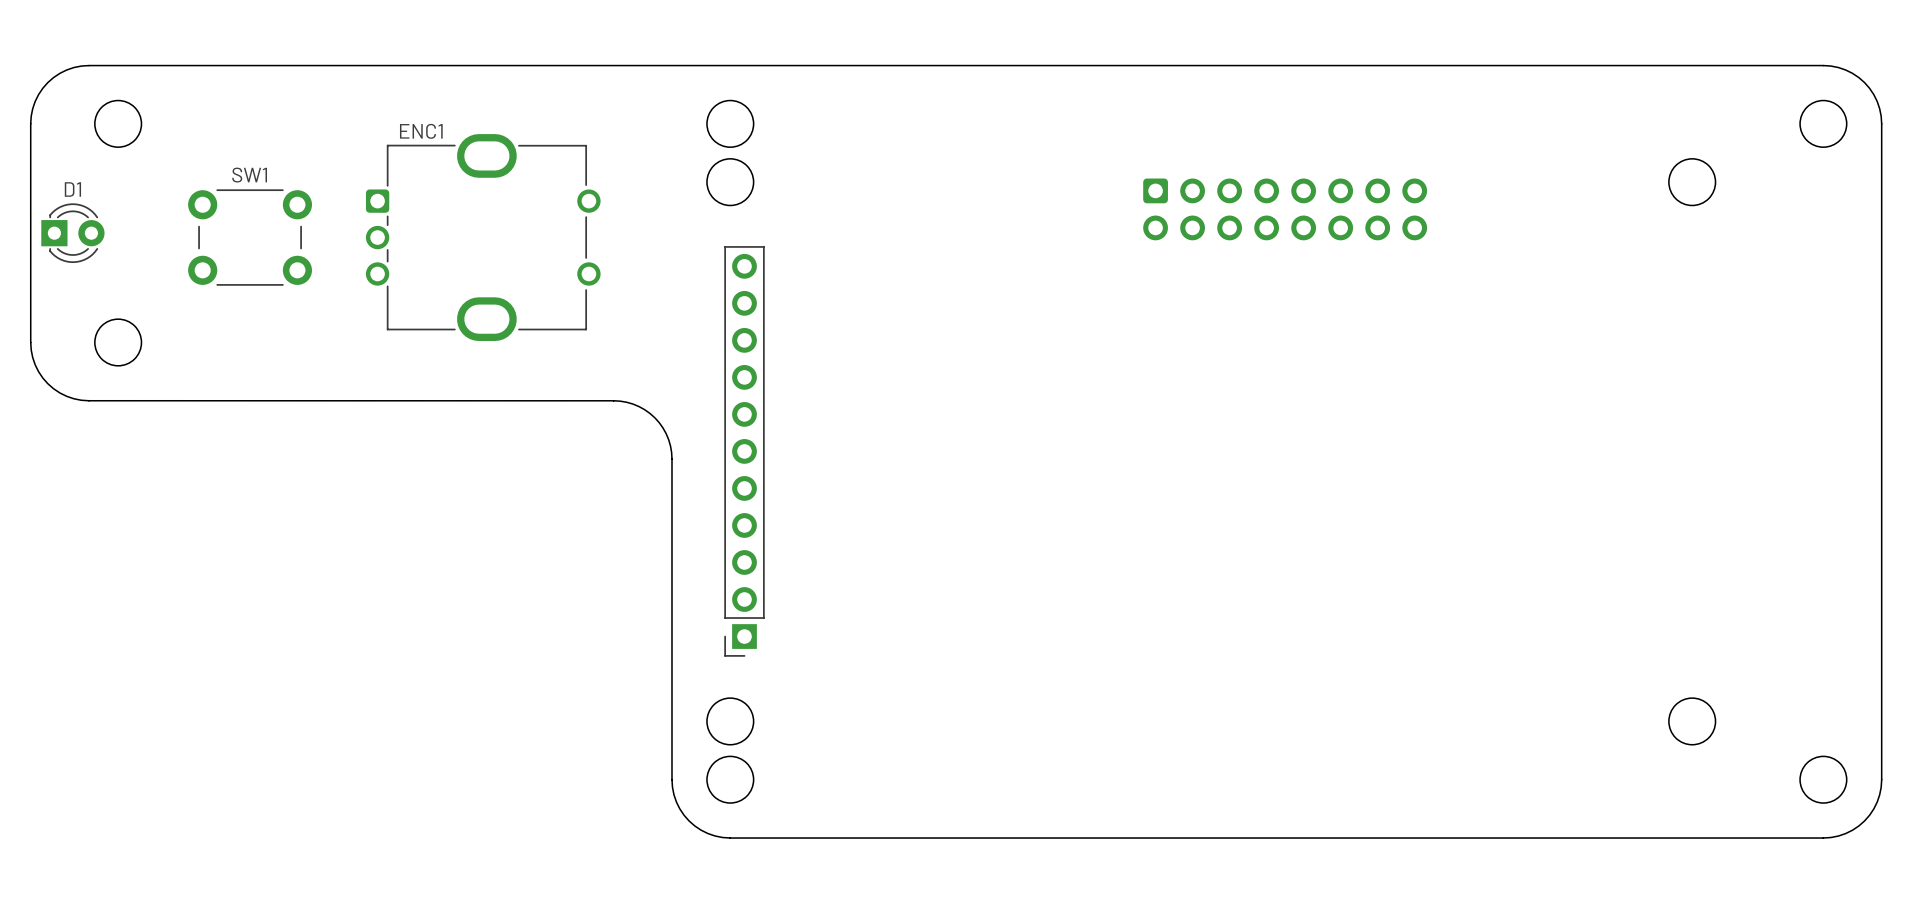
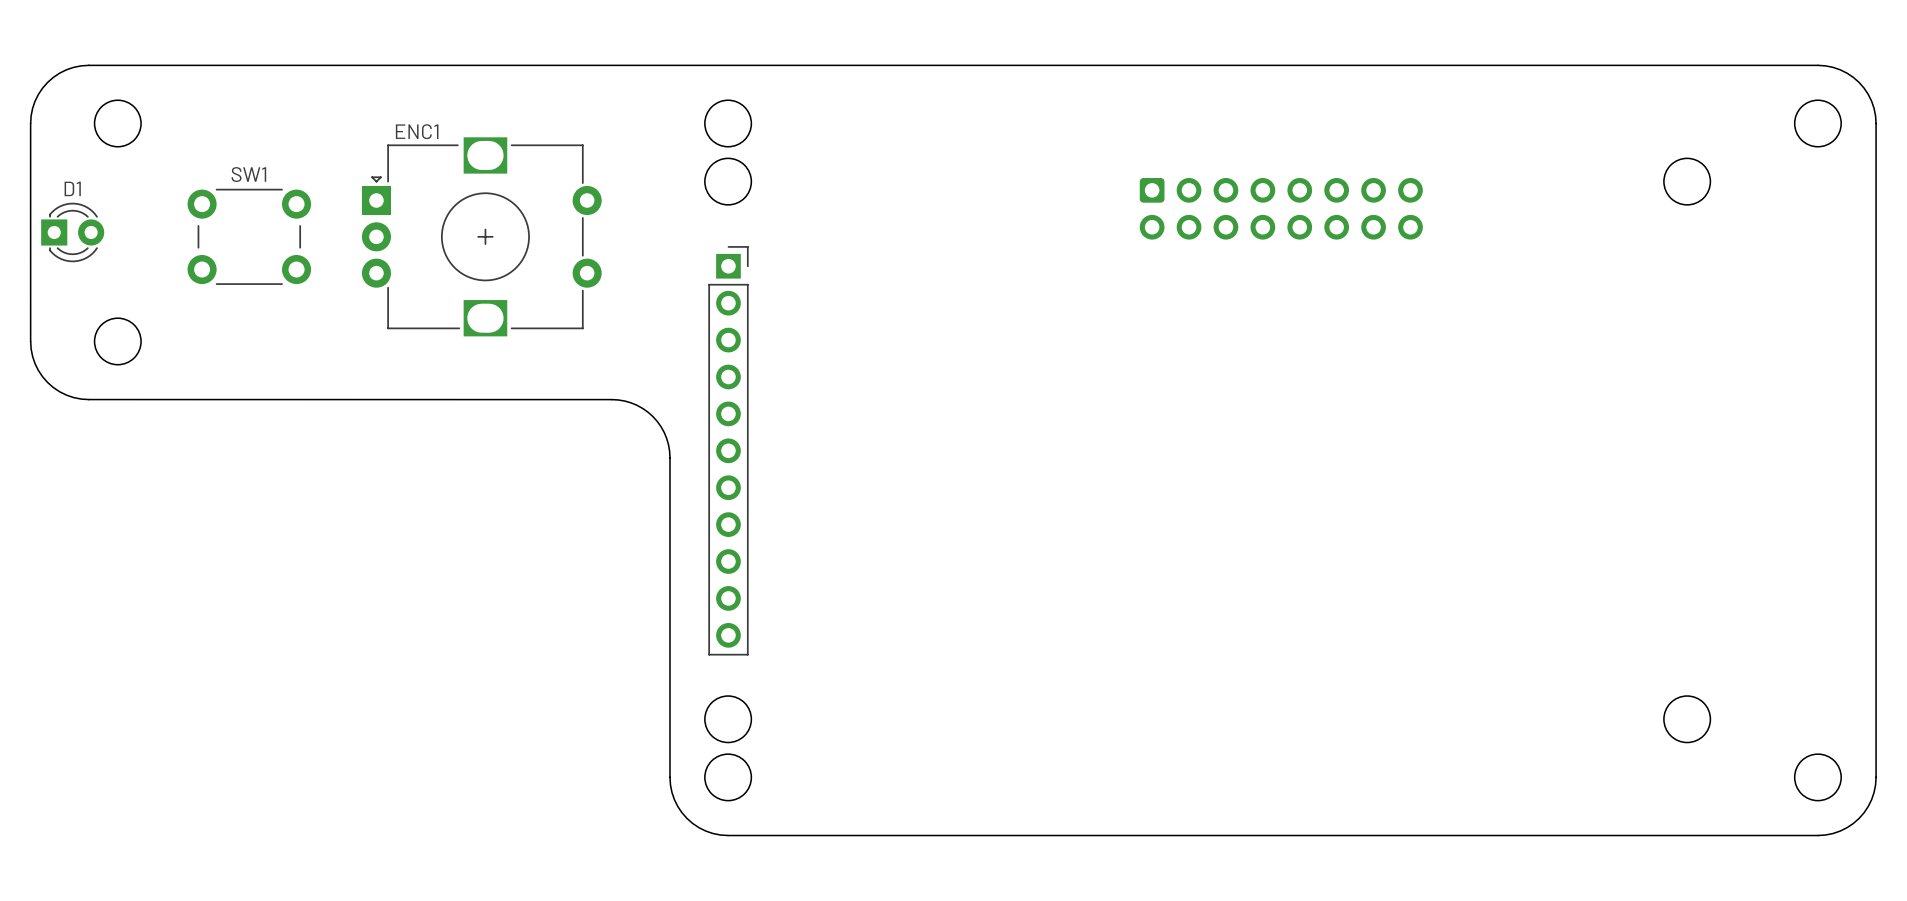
ENC1 footprint: [365, 134, 601, 342] -> [361, 137, 602, 337]
part rotation: 0° (744, 451) -> 180° (728, 450)

